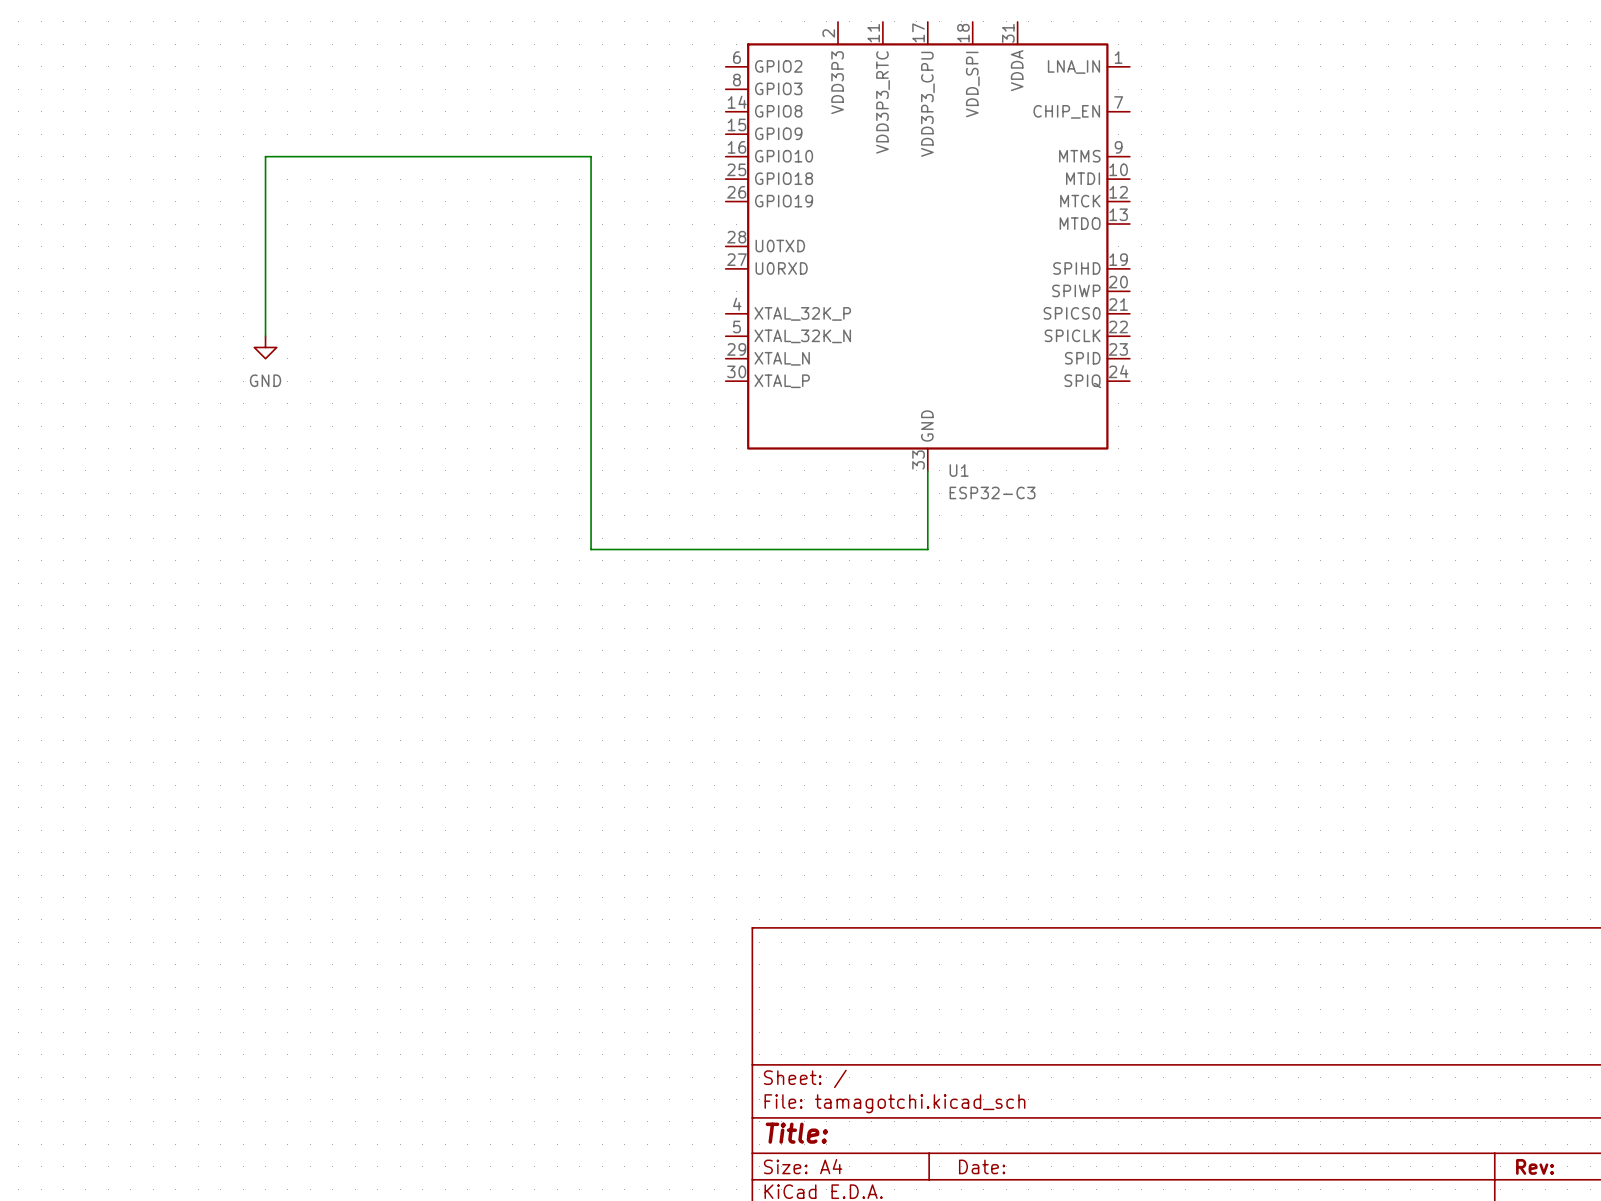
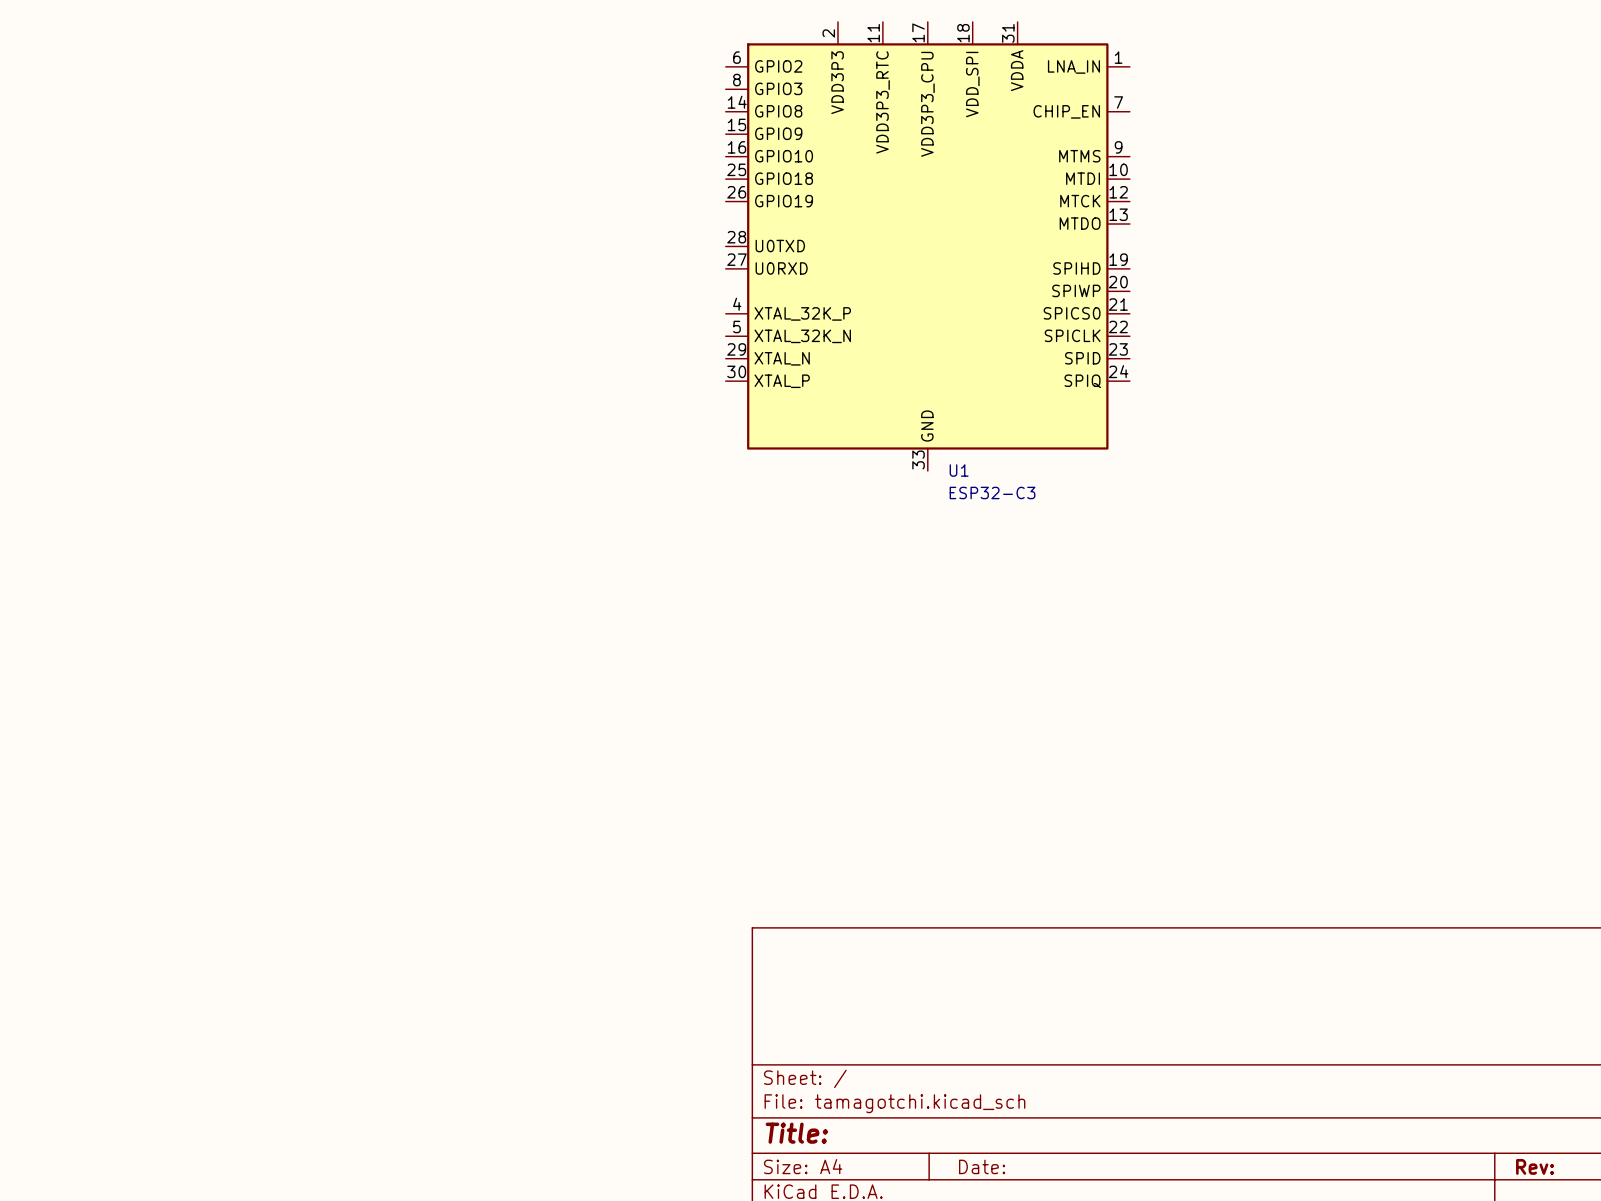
wire: (265, 336) (265, 156) (591, 156) (591, 549) (927, 549) (927, 470) -> none
power symbol: GND (265, 347) -> none

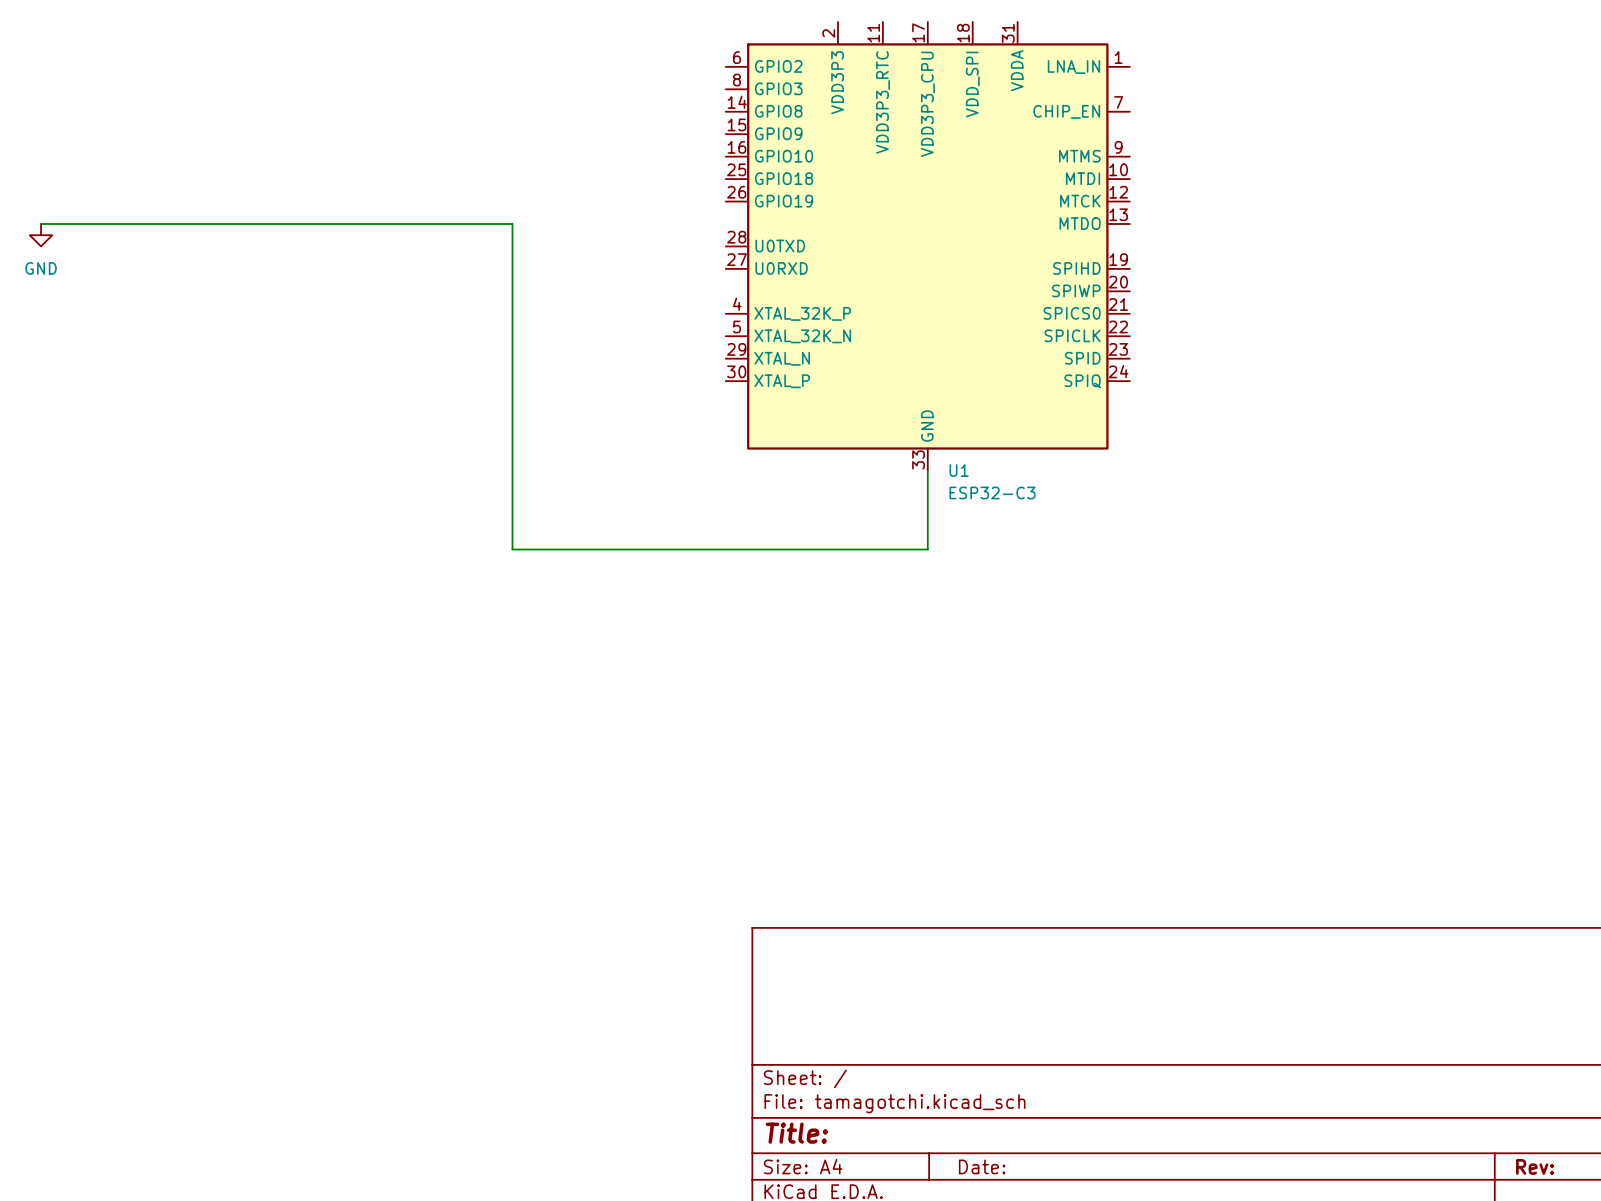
wire: none -> (41, 224) (512, 224) (512, 549) (927, 549) (927, 470)
power symbol: none -> GND (41, 235)

